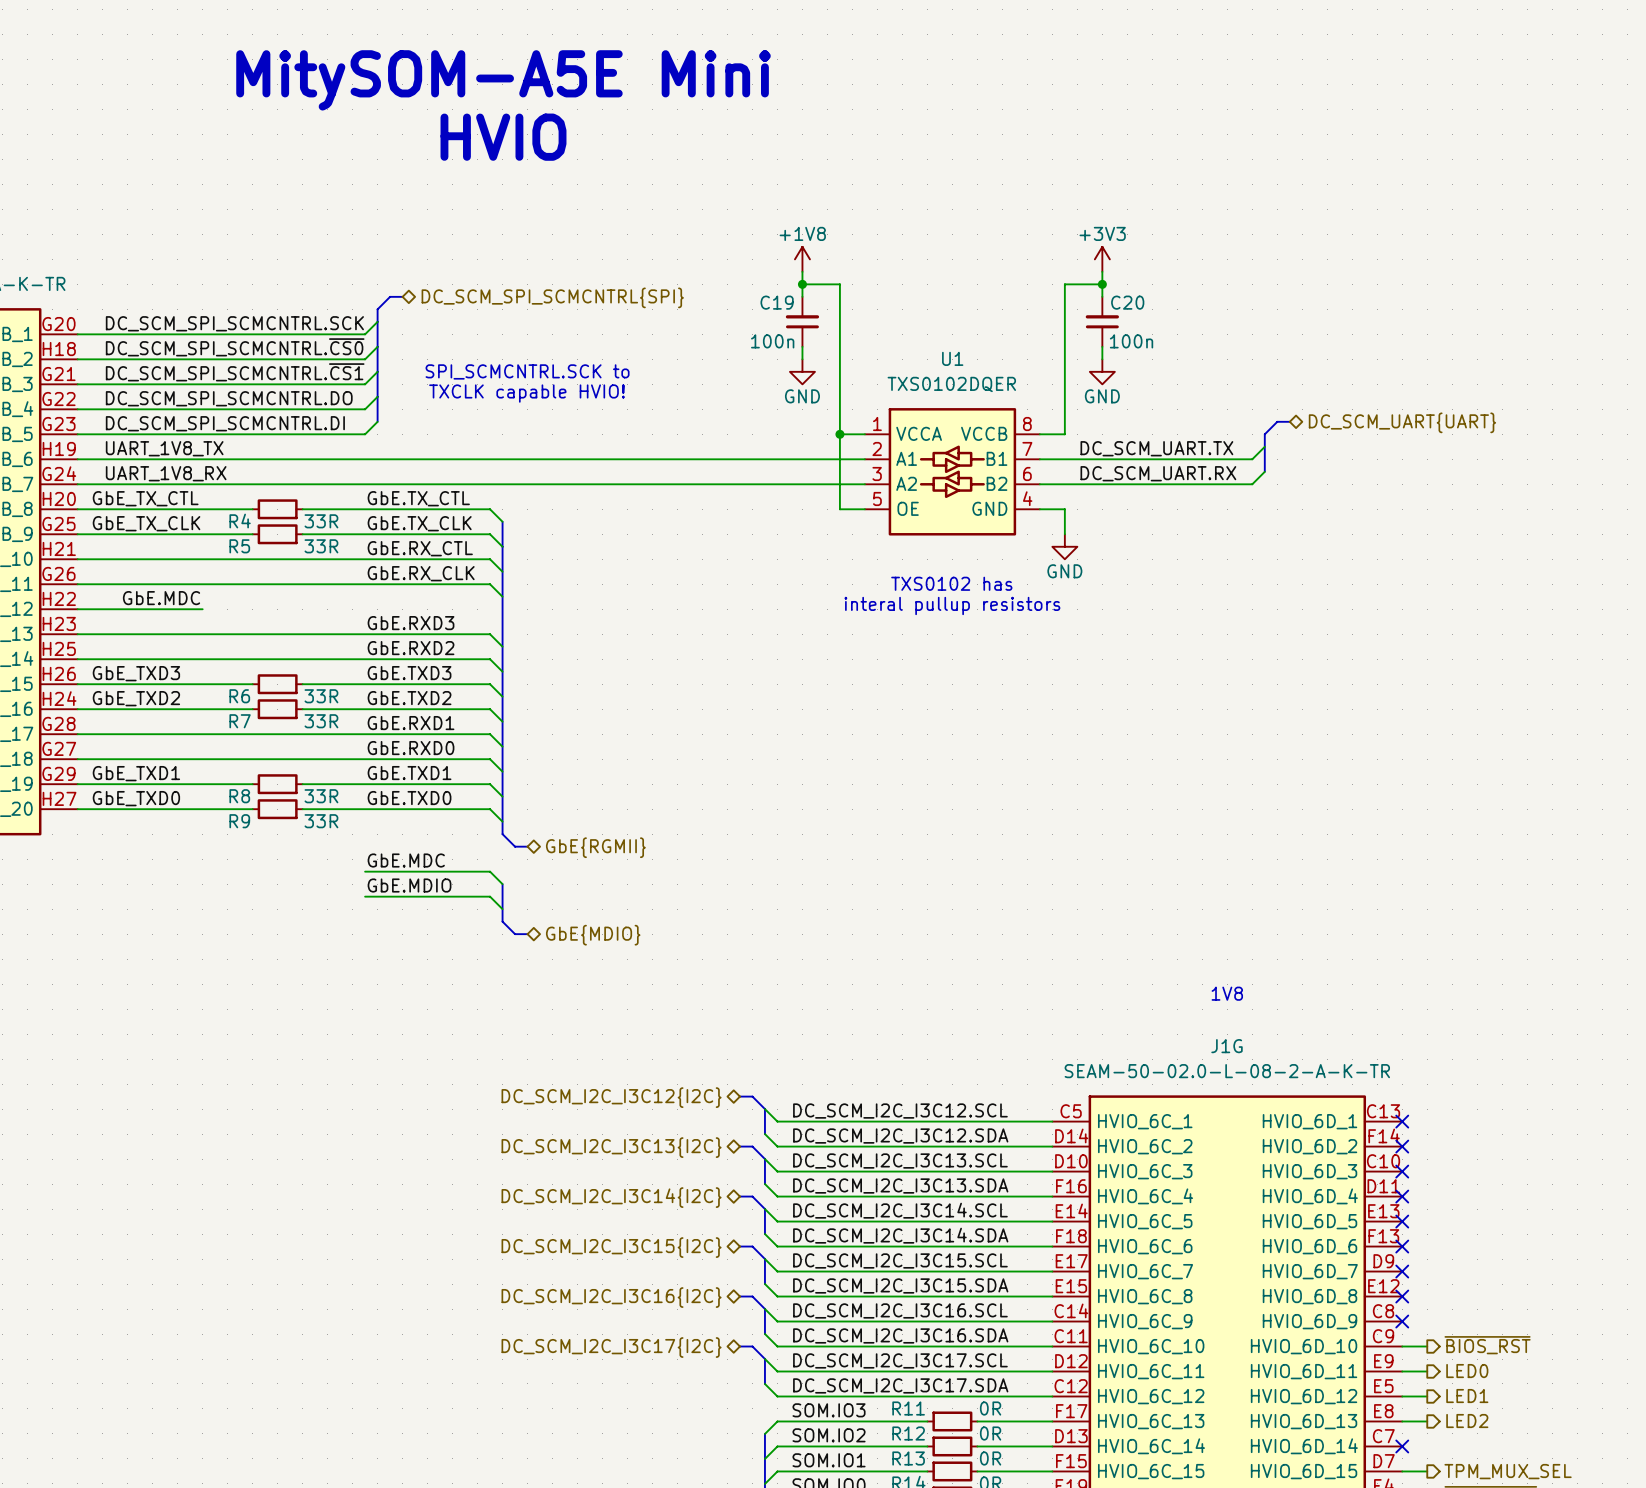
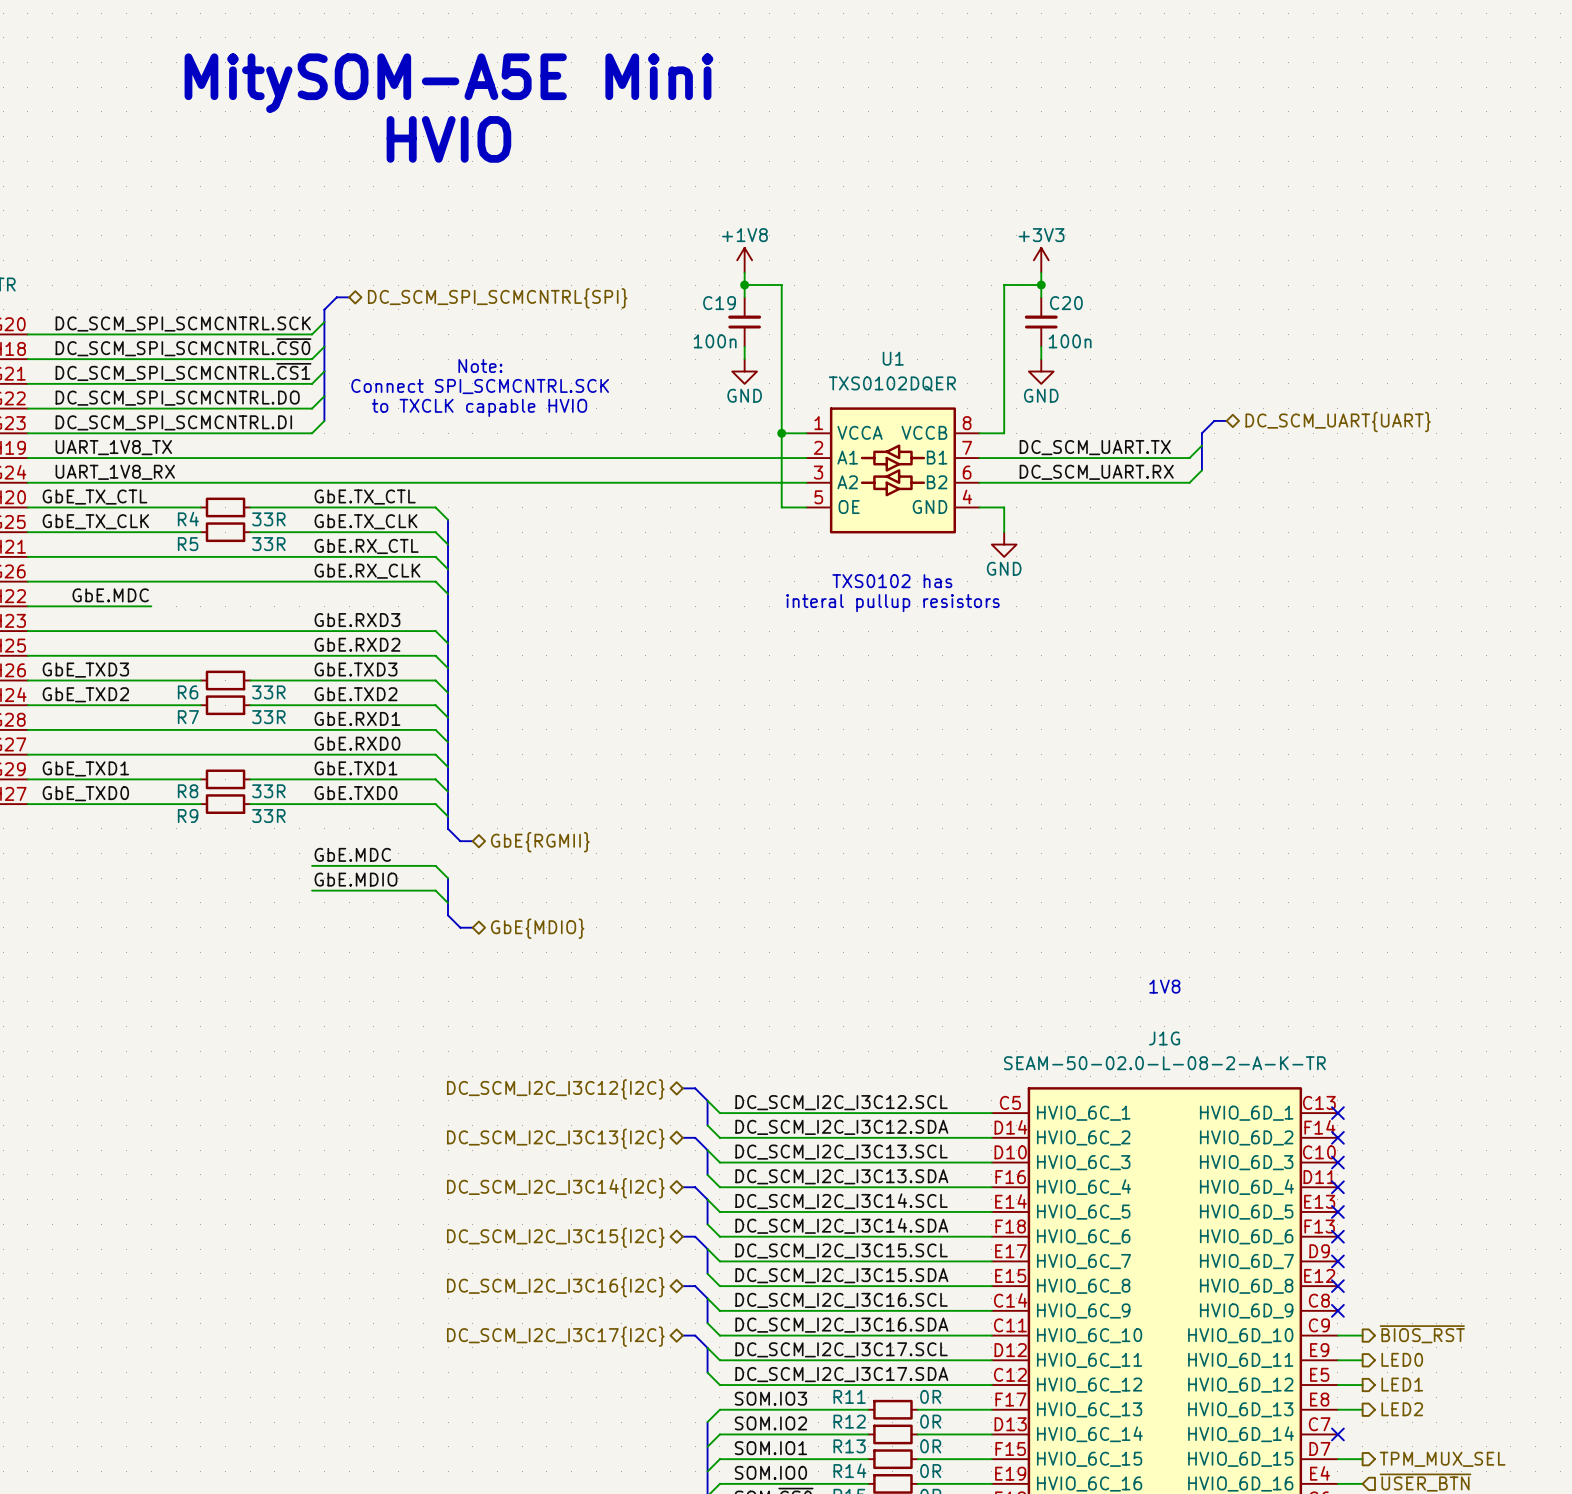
text: none -> Note: (480, 366)
text: SPI_SCMCNTRL.SCK to (527, 371) -> Connect SPI_SCMCNTRL.SCK (480, 386)
text: TXCLK capable HVIO! (526, 393) -> to TXCLK capable HVIO (479, 407)

